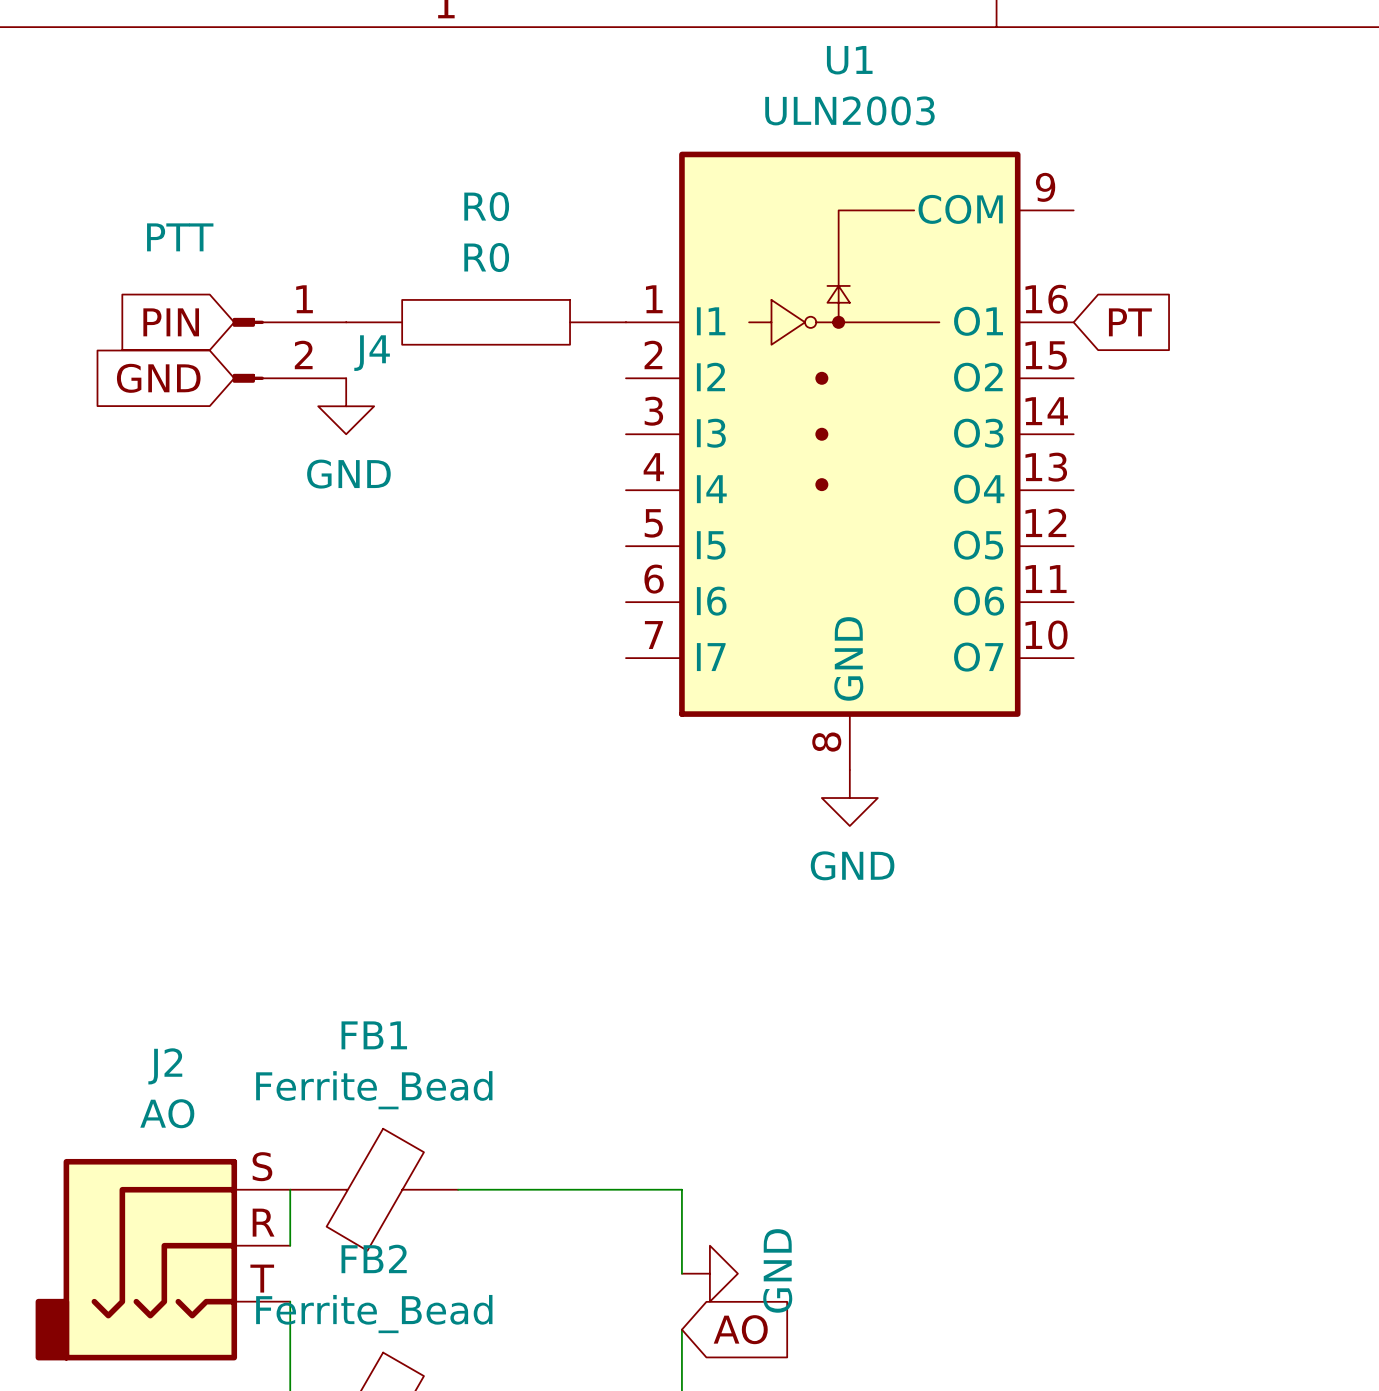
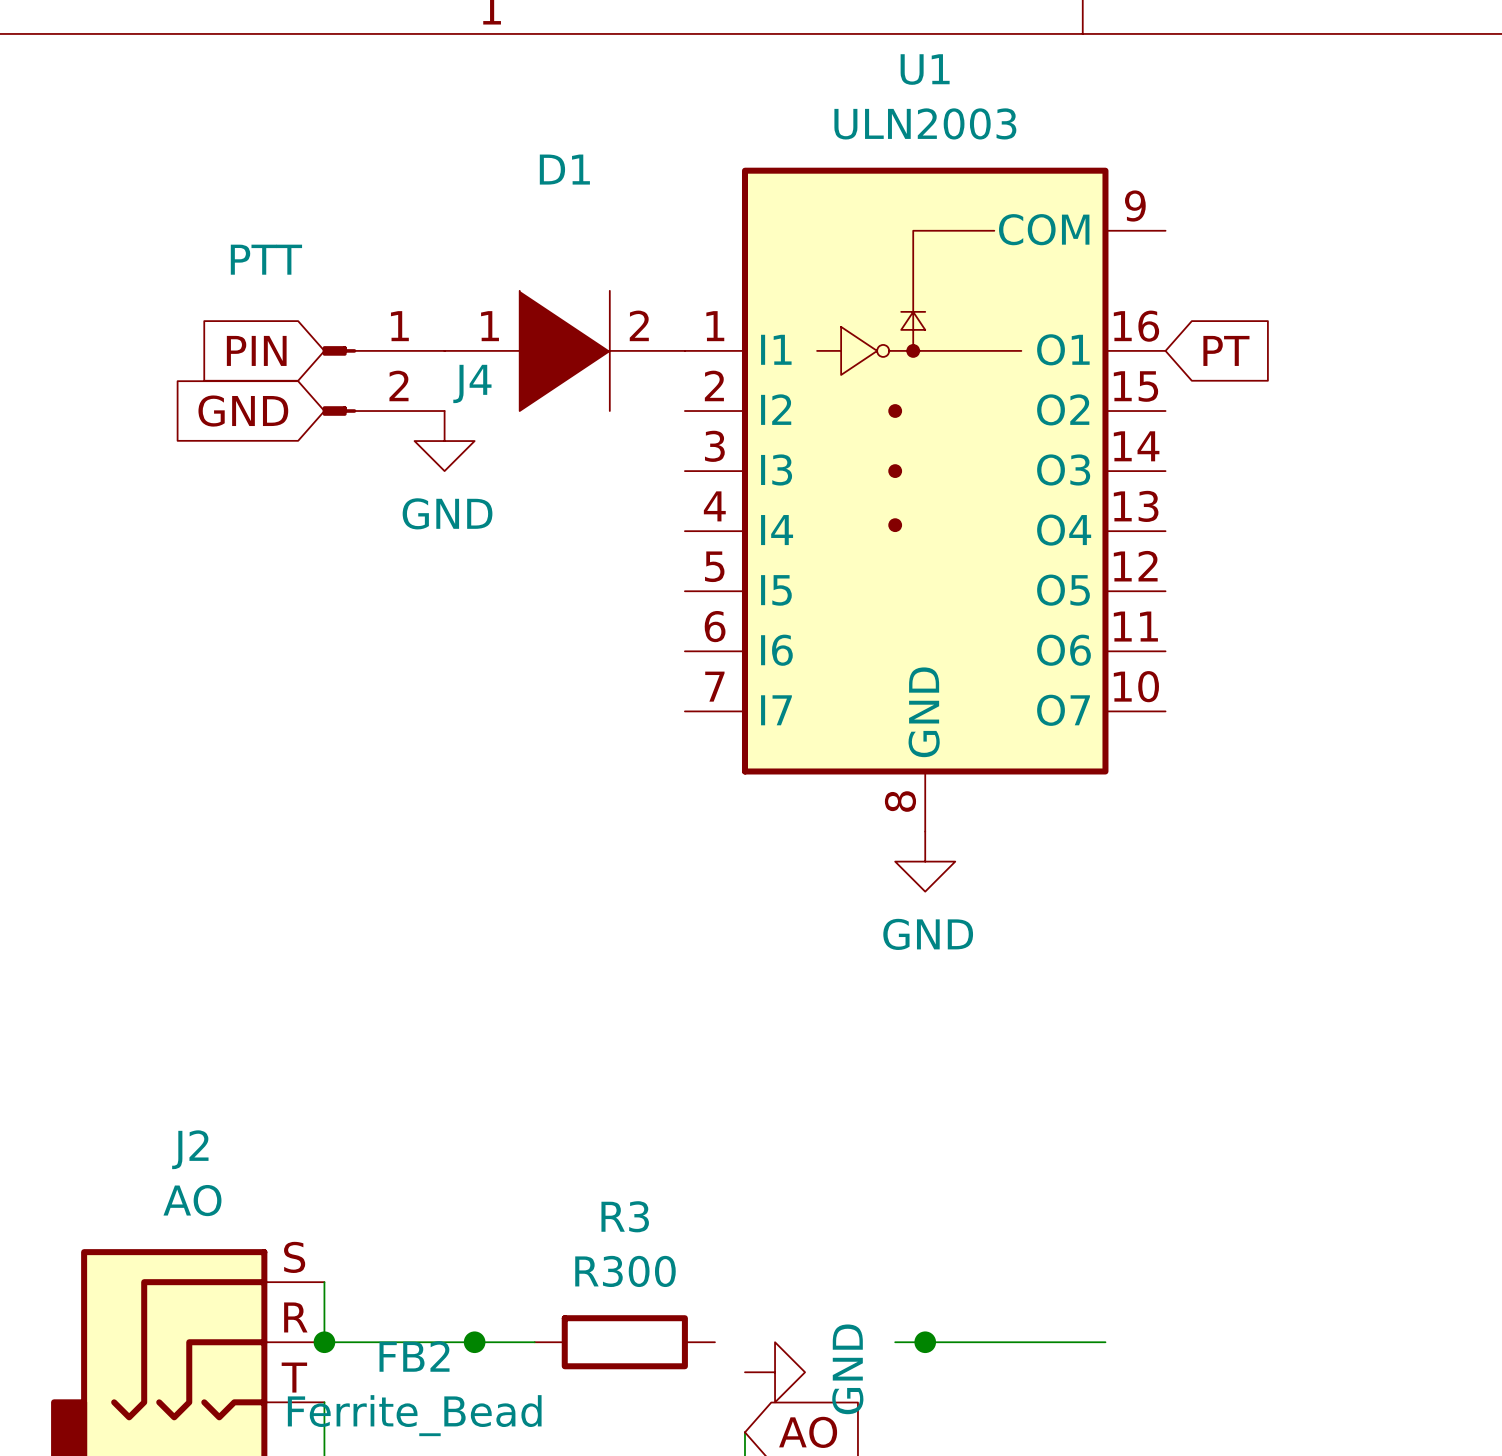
global label position: PIN (171, 322) -> PIN (256, 350)
R0: R0 (486, 322) -> none
D1: none -> (564, 350)
J4 position: (289, 350) -> (383, 380)
global label position: GND (158, 378) -> GND (243, 411)
power symbol position: GND (346, 406) -> GND (444, 441)
FB1: Ferrite_Bead (374, 1189) -> none
wire: (458, 1189) (681, 1189) (681, 1273) -> none
wire: none -> (324, 1342) (534, 1342)
junction: none -> (324, 1342)
junction: none -> (474, 1342)
R3: none -> R300 (624, 1342)
wire: none -> (895, 1342) (1105, 1342)
junction: none -> (925, 1342)

